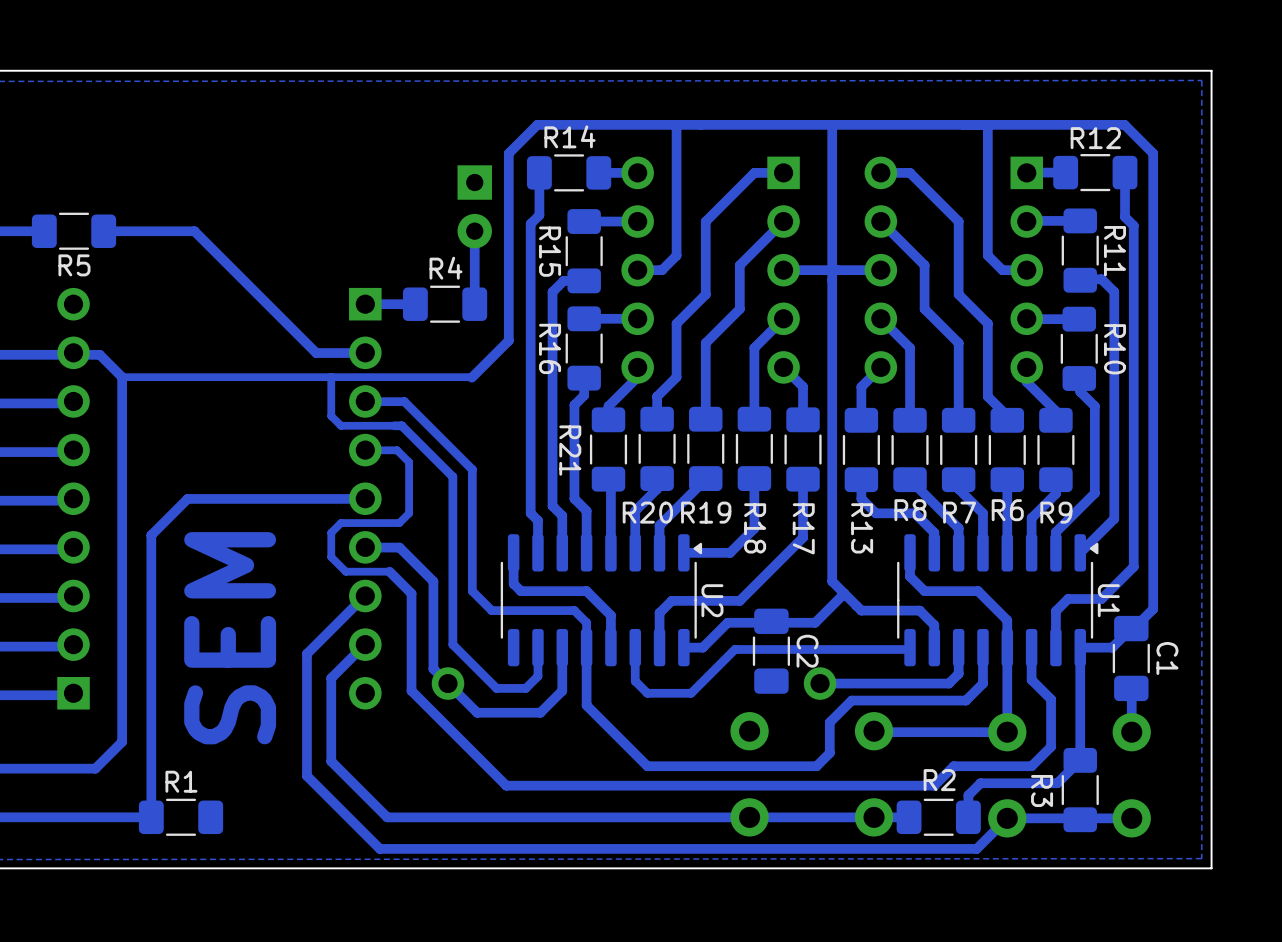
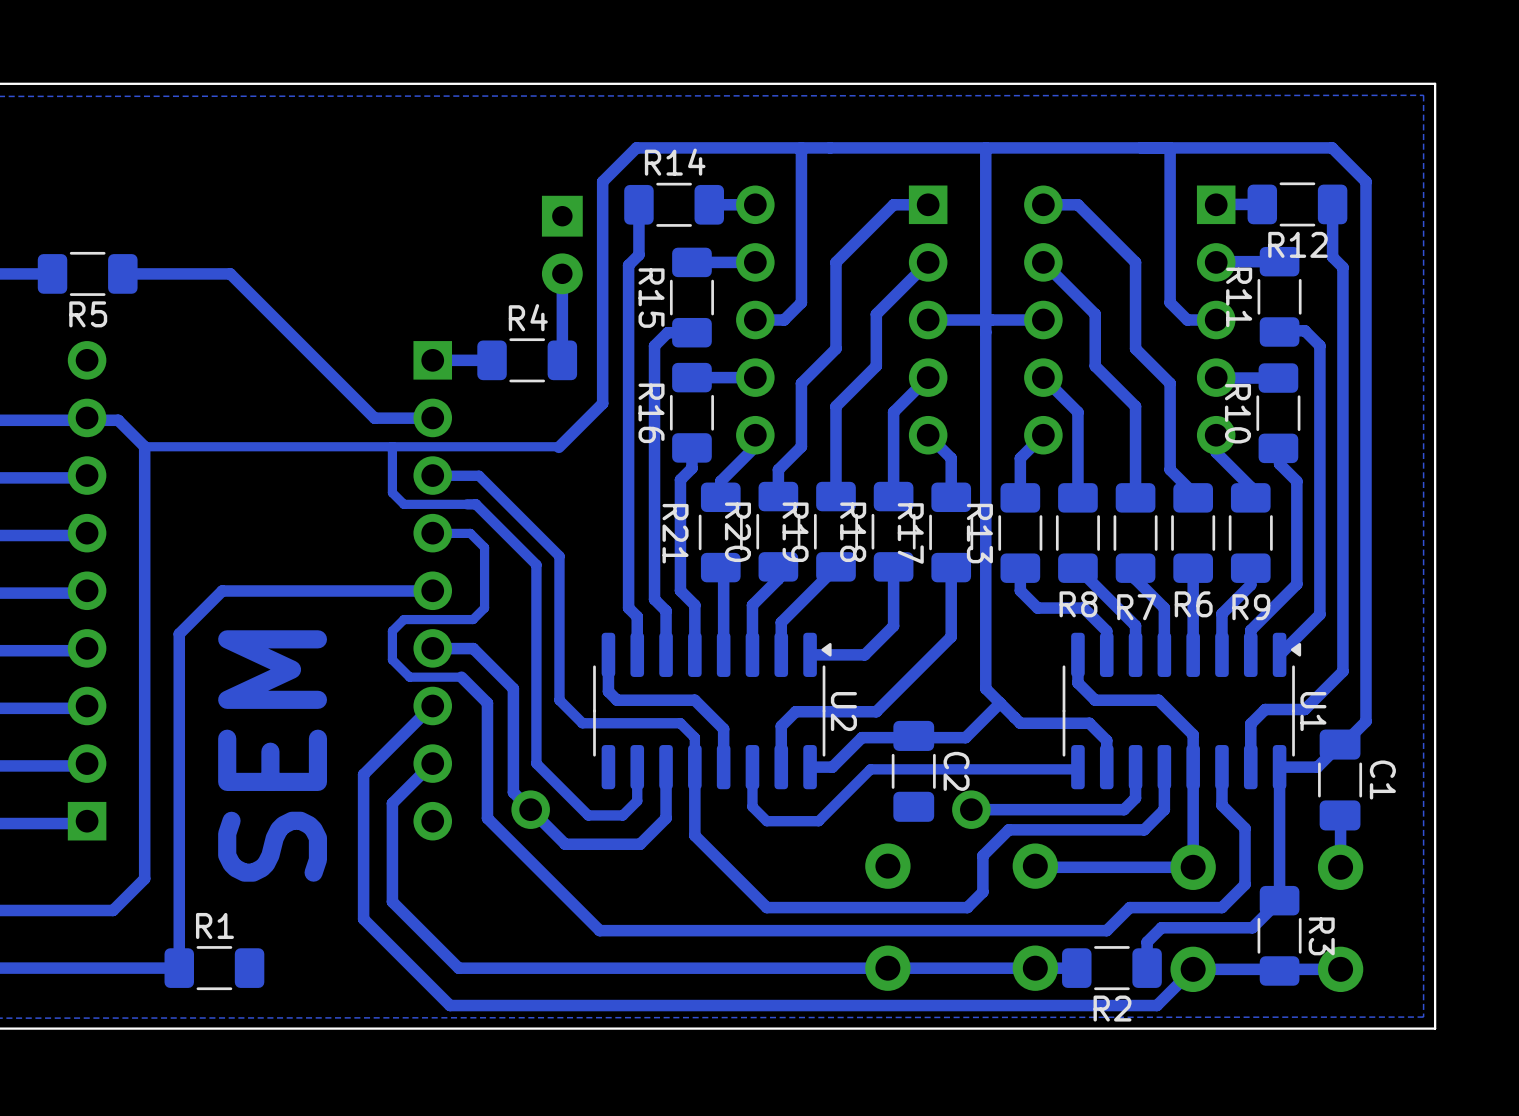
R12 name position: R12 (1095, 138) -> R12 (1297, 244)
R11 name position: R11 (1115, 251) -> R11 (1239, 297)
R10 name position: R10 (1115, 349) -> R10 (1237, 413)
R20 name rotation: 0° (647, 512) -> 90° clockwise (737, 532)
R20 name position: R20 (647, 512) -> R20 (737, 532)
R19 name rotation: 0° (706, 512) -> 90° clockwise (795, 532)
R19 name position: R19 (706, 512) -> R19 (795, 532)
R18 name position: R18 (755, 528) -> R18 (853, 532)
R17 name position: R17 (803, 528) -> R17 (910, 533)
R13 name position: R13 (862, 528) -> R13 (979, 533)
R2 name position: R2 (939, 780) -> R2 (1112, 1008)
R3 name position: R3 (1042, 791) -> R3 (1321, 936)

